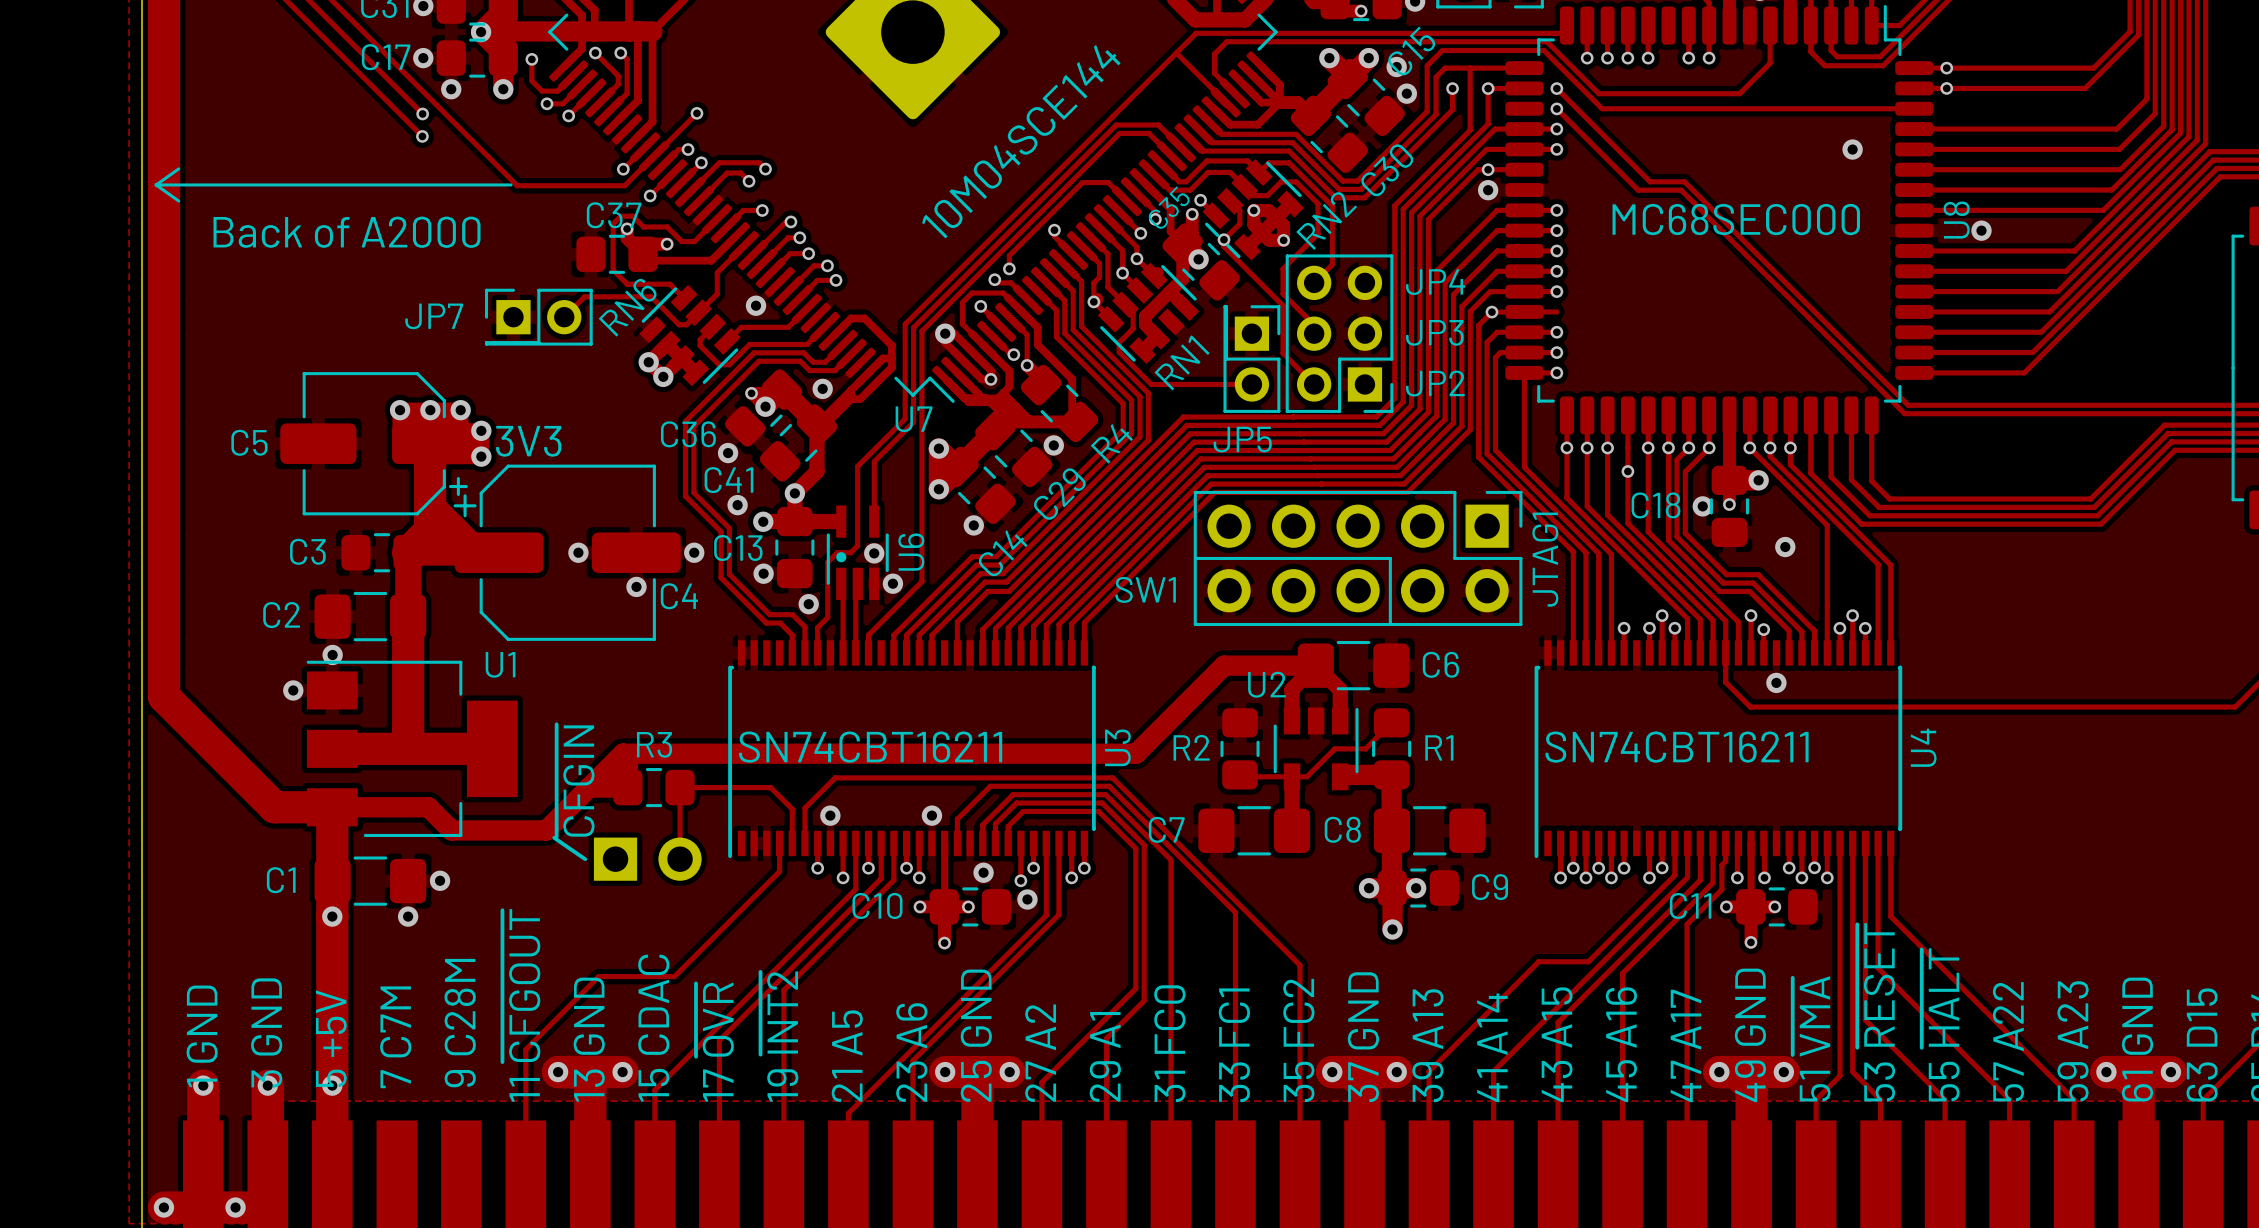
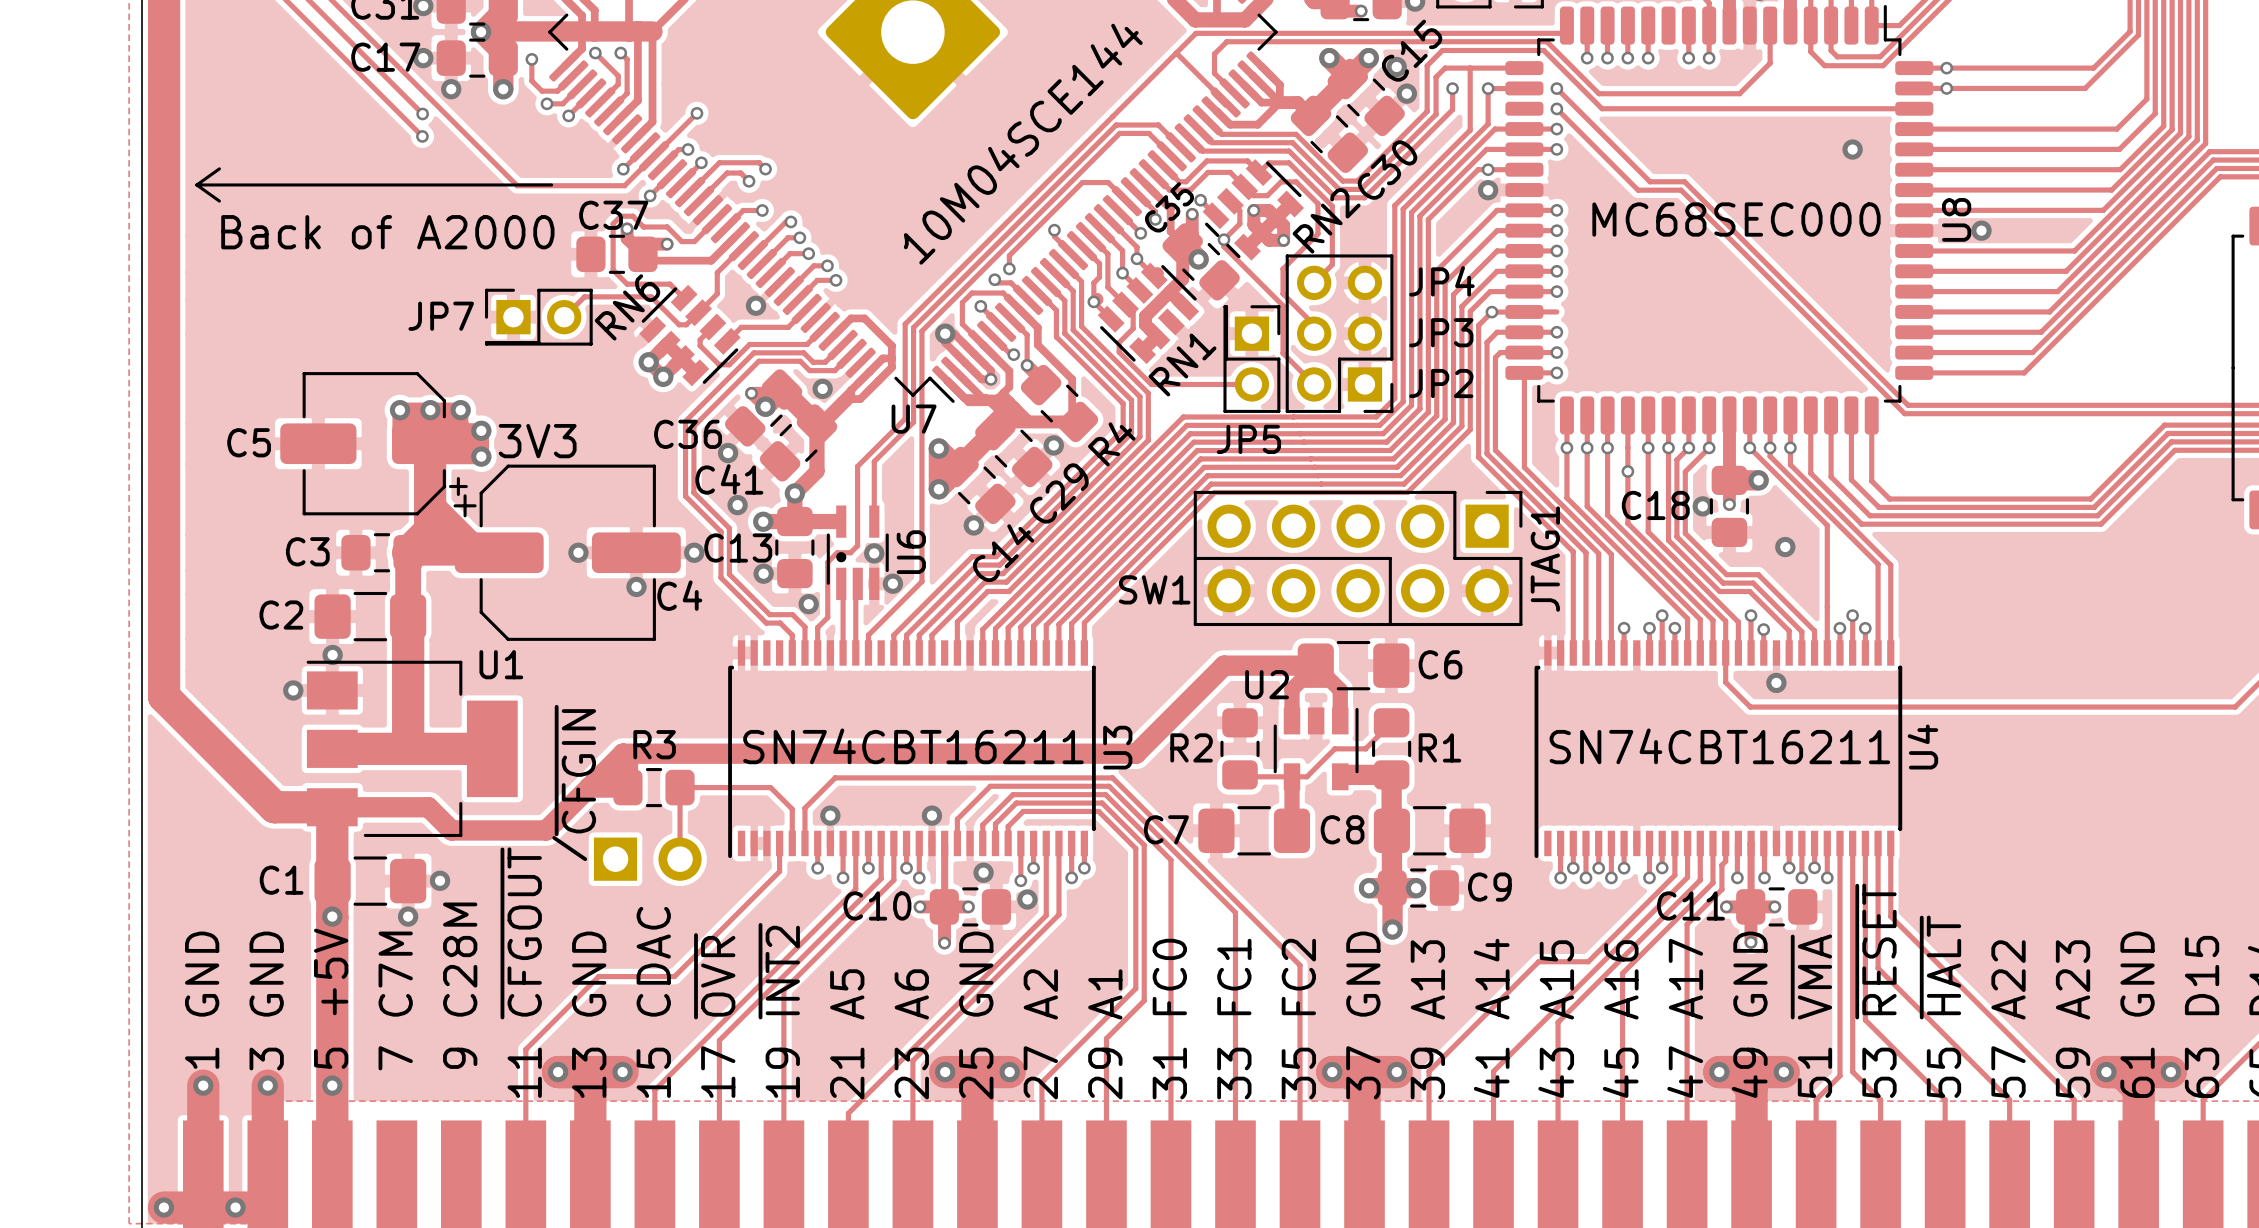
line: (178, 168) (156, 184) -> none
line: none -> (219, 168) (196, 184) (219, 201)
line: (156, 184) (196, 184) -> (511, 184) (551, 184)
line: (156, 184) (178, 201) -> none
text position: Back of A2000 (347, 232) -> Back of A2000 (387, 232)

